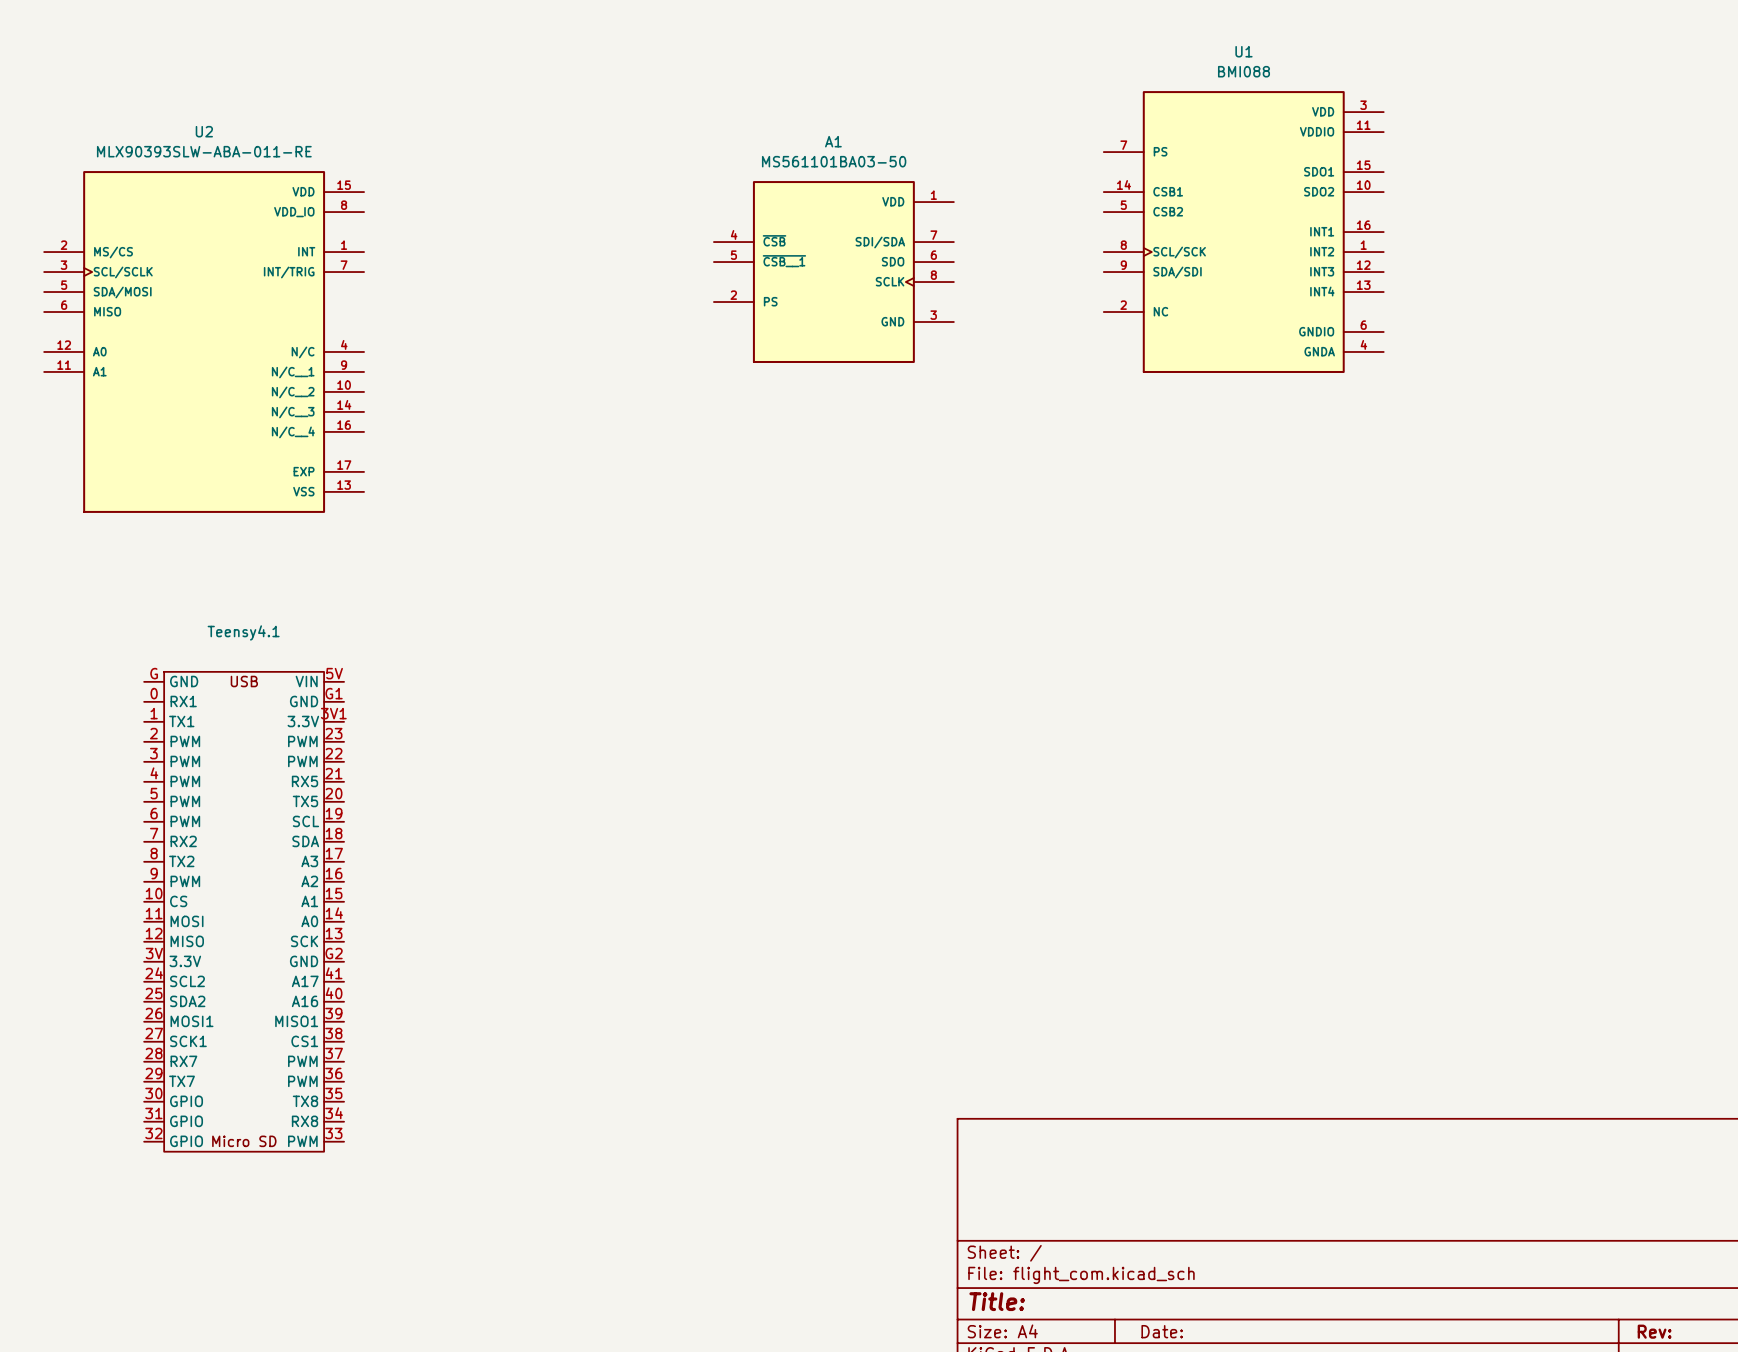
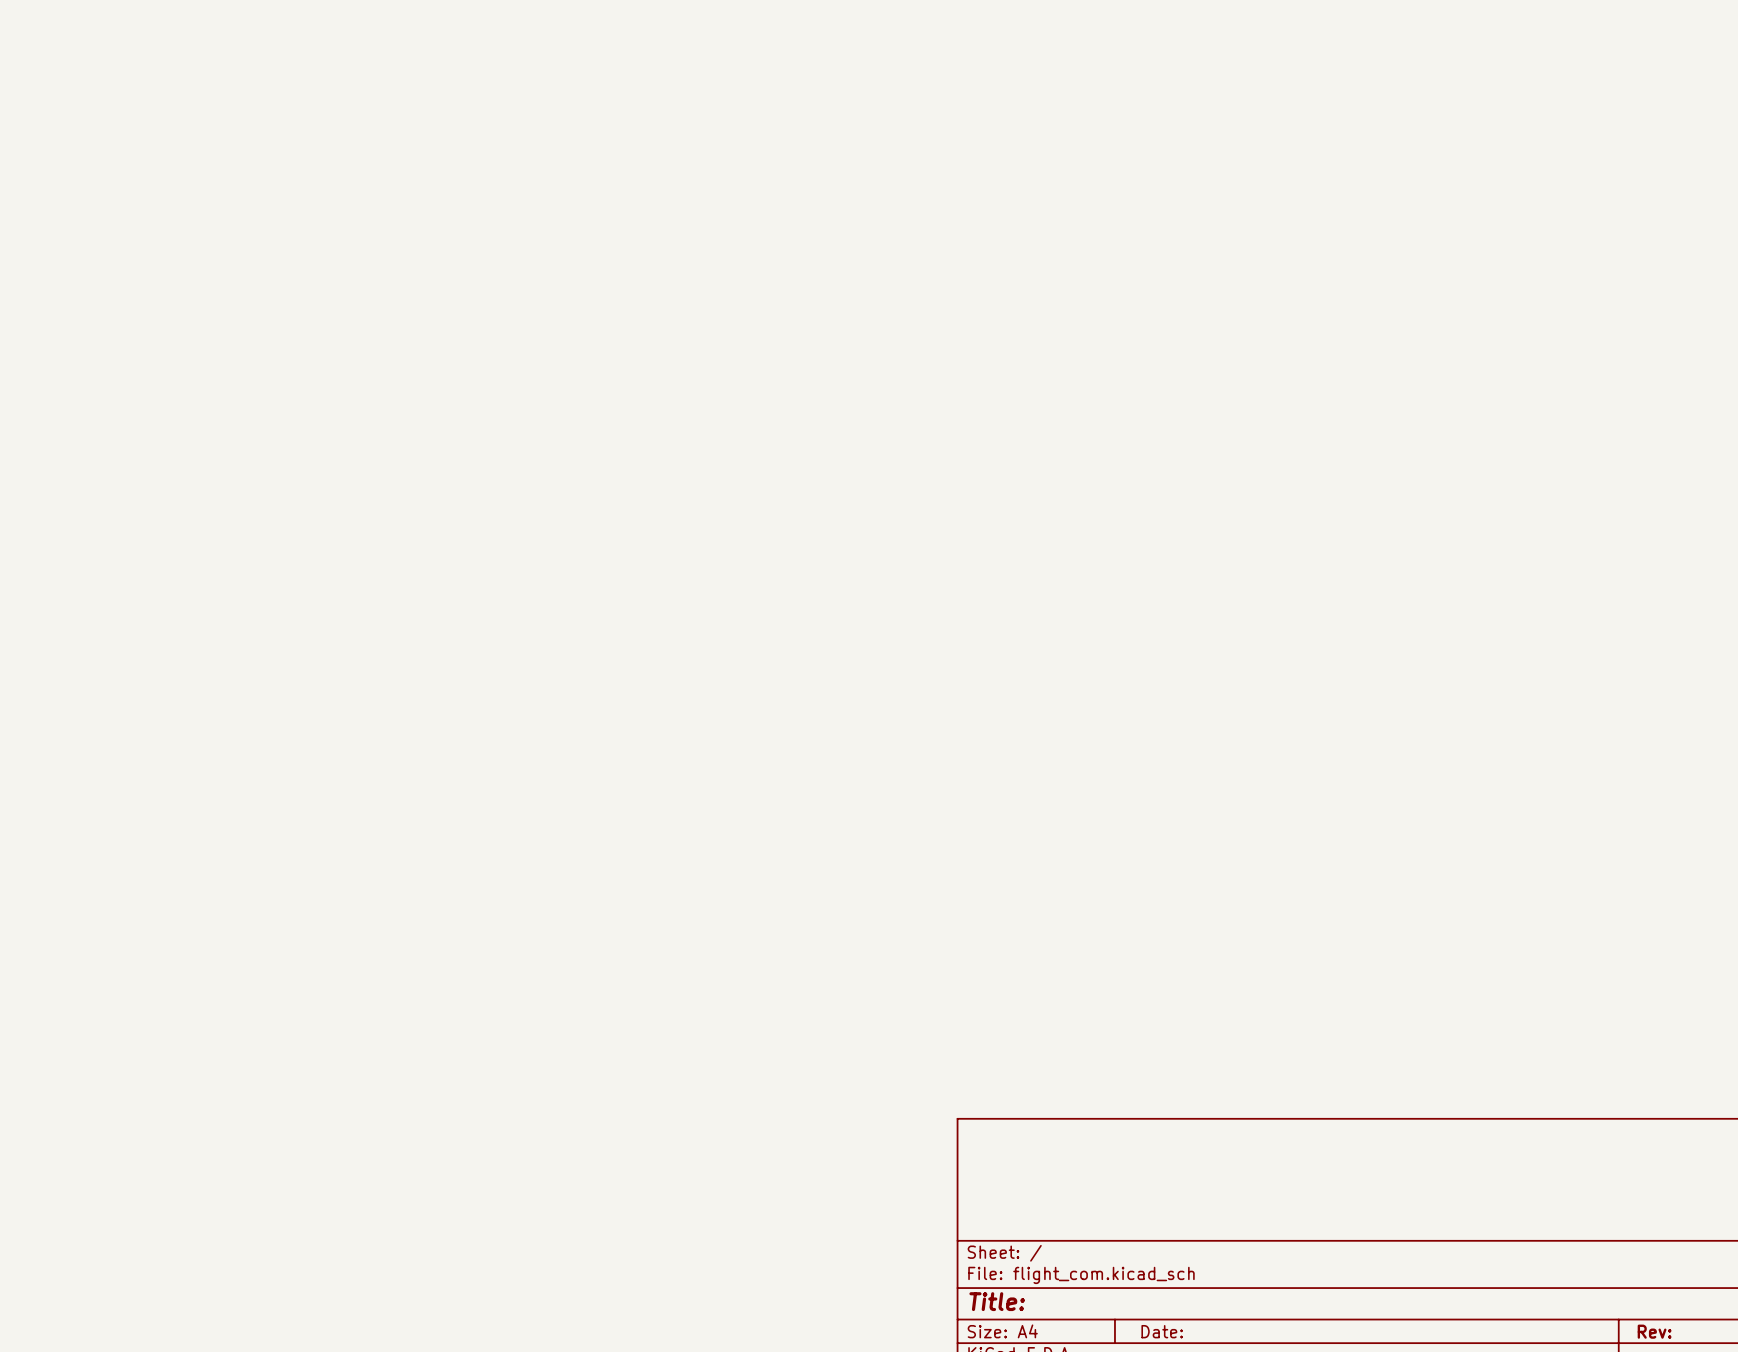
U1: BMI088 (1243, 232) -> none
A1: MS561101BA03-50 (833, 272) -> none
U2: MLX90393SLW-ABA-011-RE (204, 341) -> none
Teensy4.1: (244, 911) -> none

